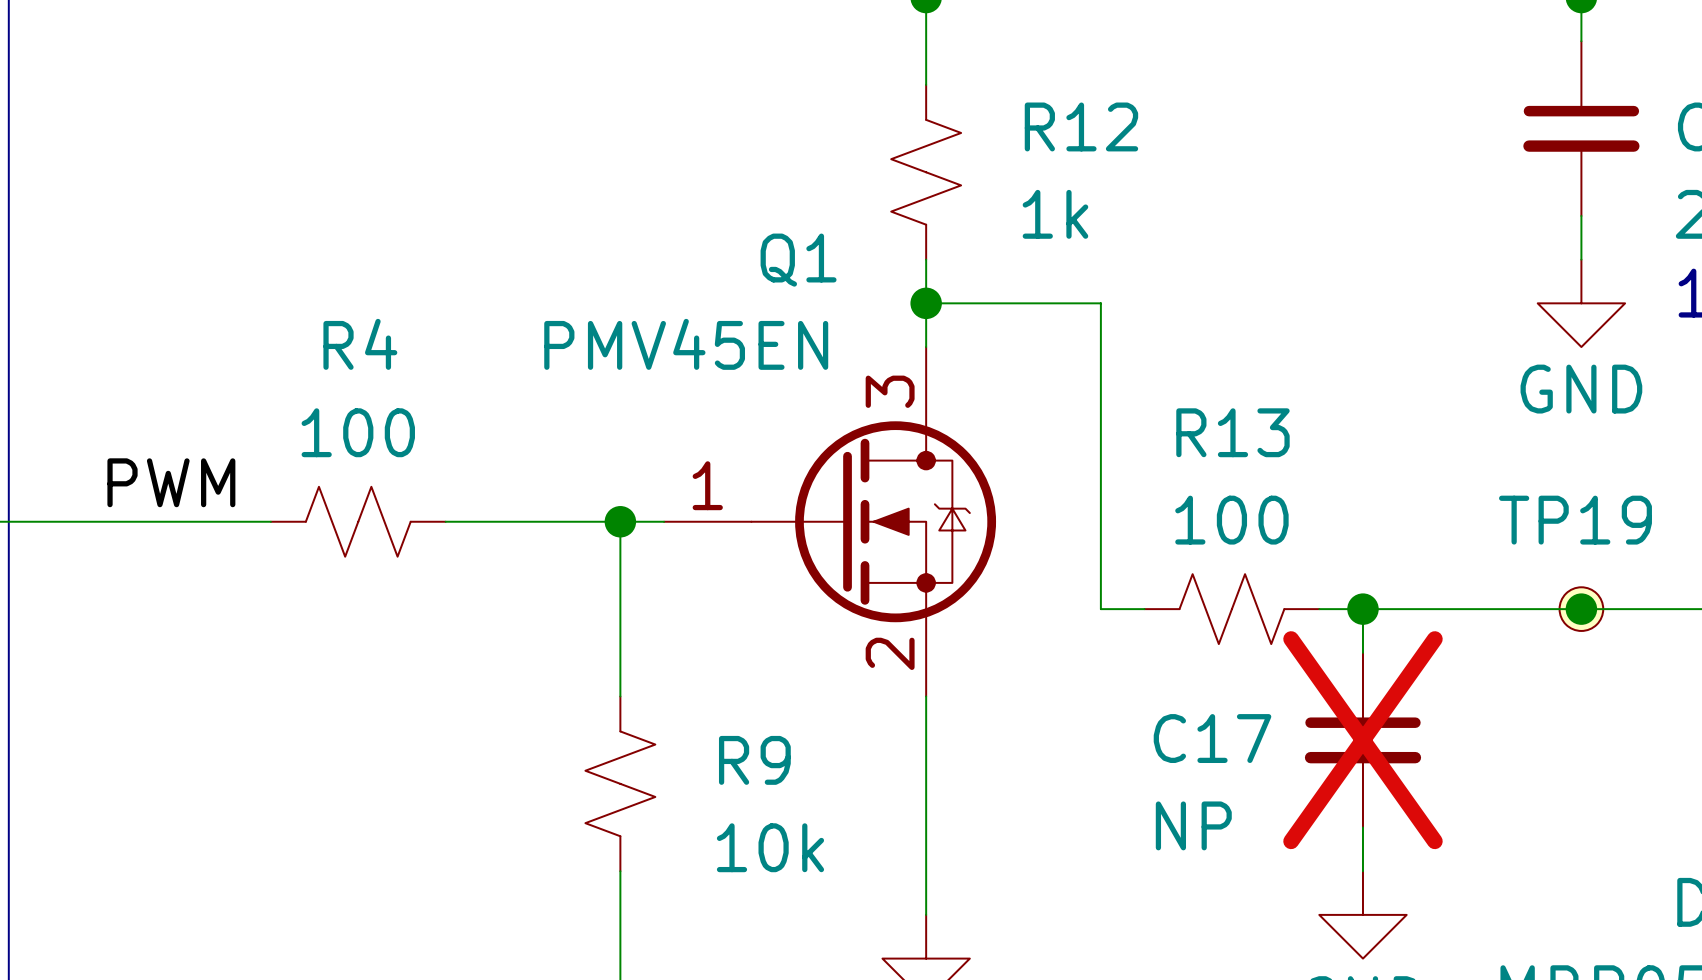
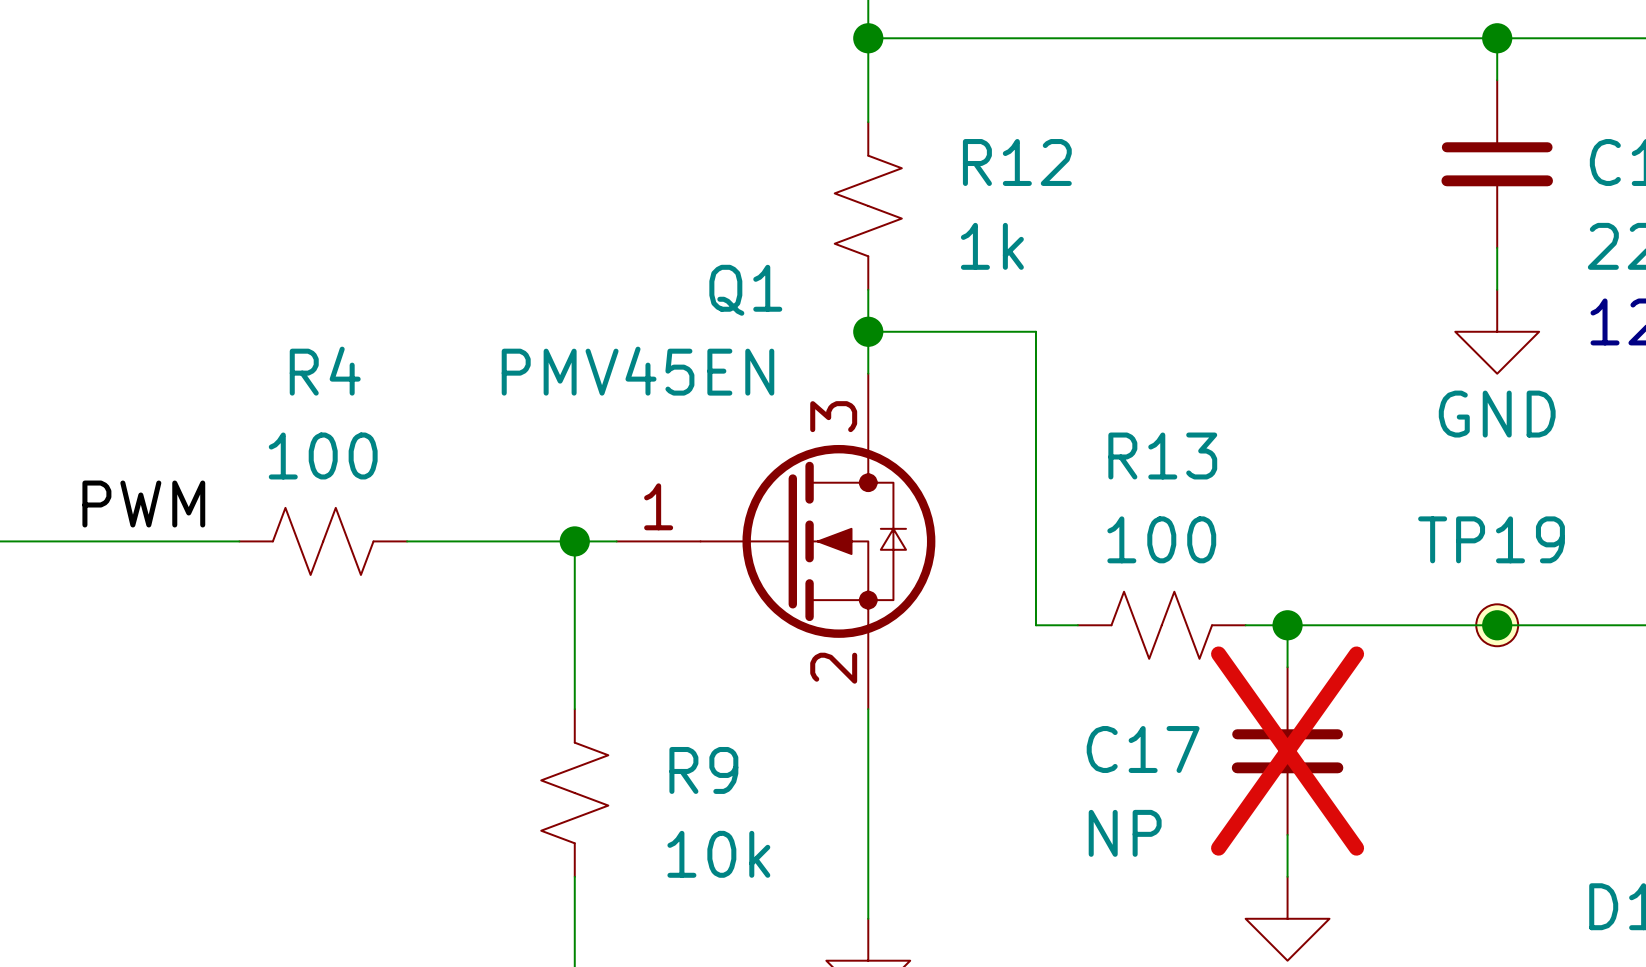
Q1 symbol: [664, 347, 997, 697] -> [616, 373, 936, 710]

